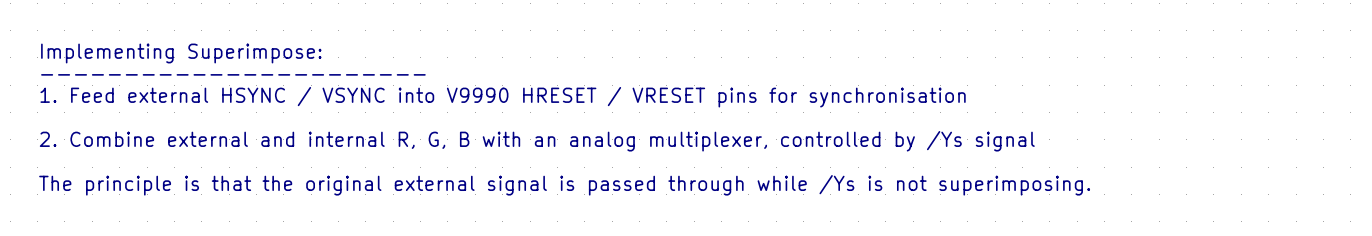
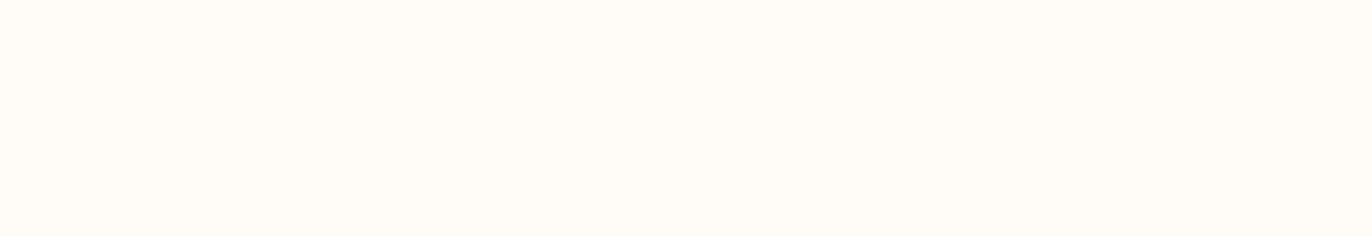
text: Implementing Superimpose: (181, 53) -> none
text: ----------------------- (233, 74) -> none
text: 1. Feed external HSYNC / VSYNC into V9990 HRESET / VRESET pins for synchronisation (503, 97) -> none
text: 2. Combine external and internal R, G, B with an analog multiplexer, controlled by /Ys signal (537, 141) -> none
text: The principle is that the original external signal is passed through while /Ys is not superimposing. (564, 185) -> none

